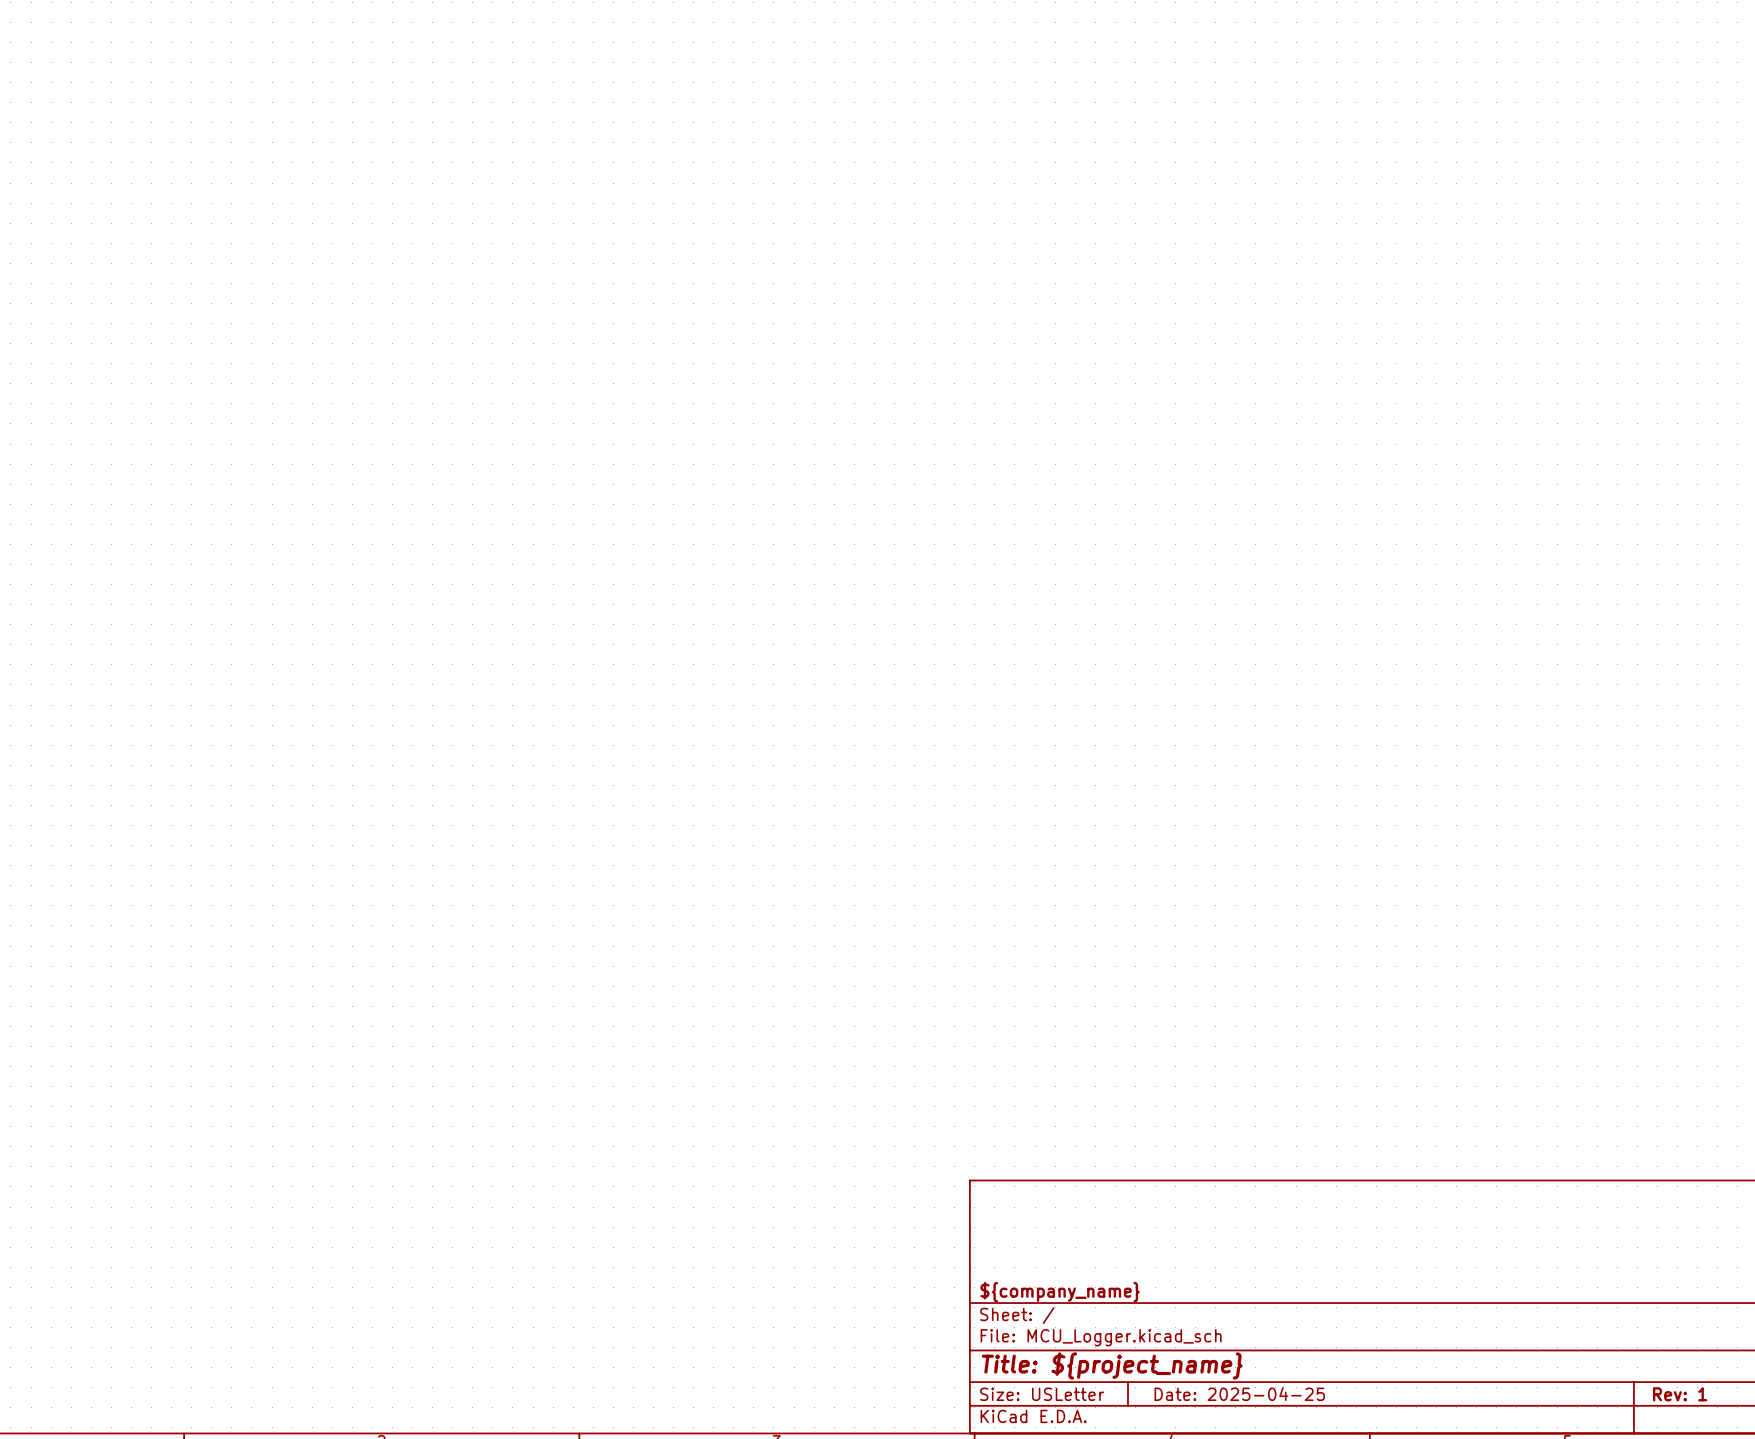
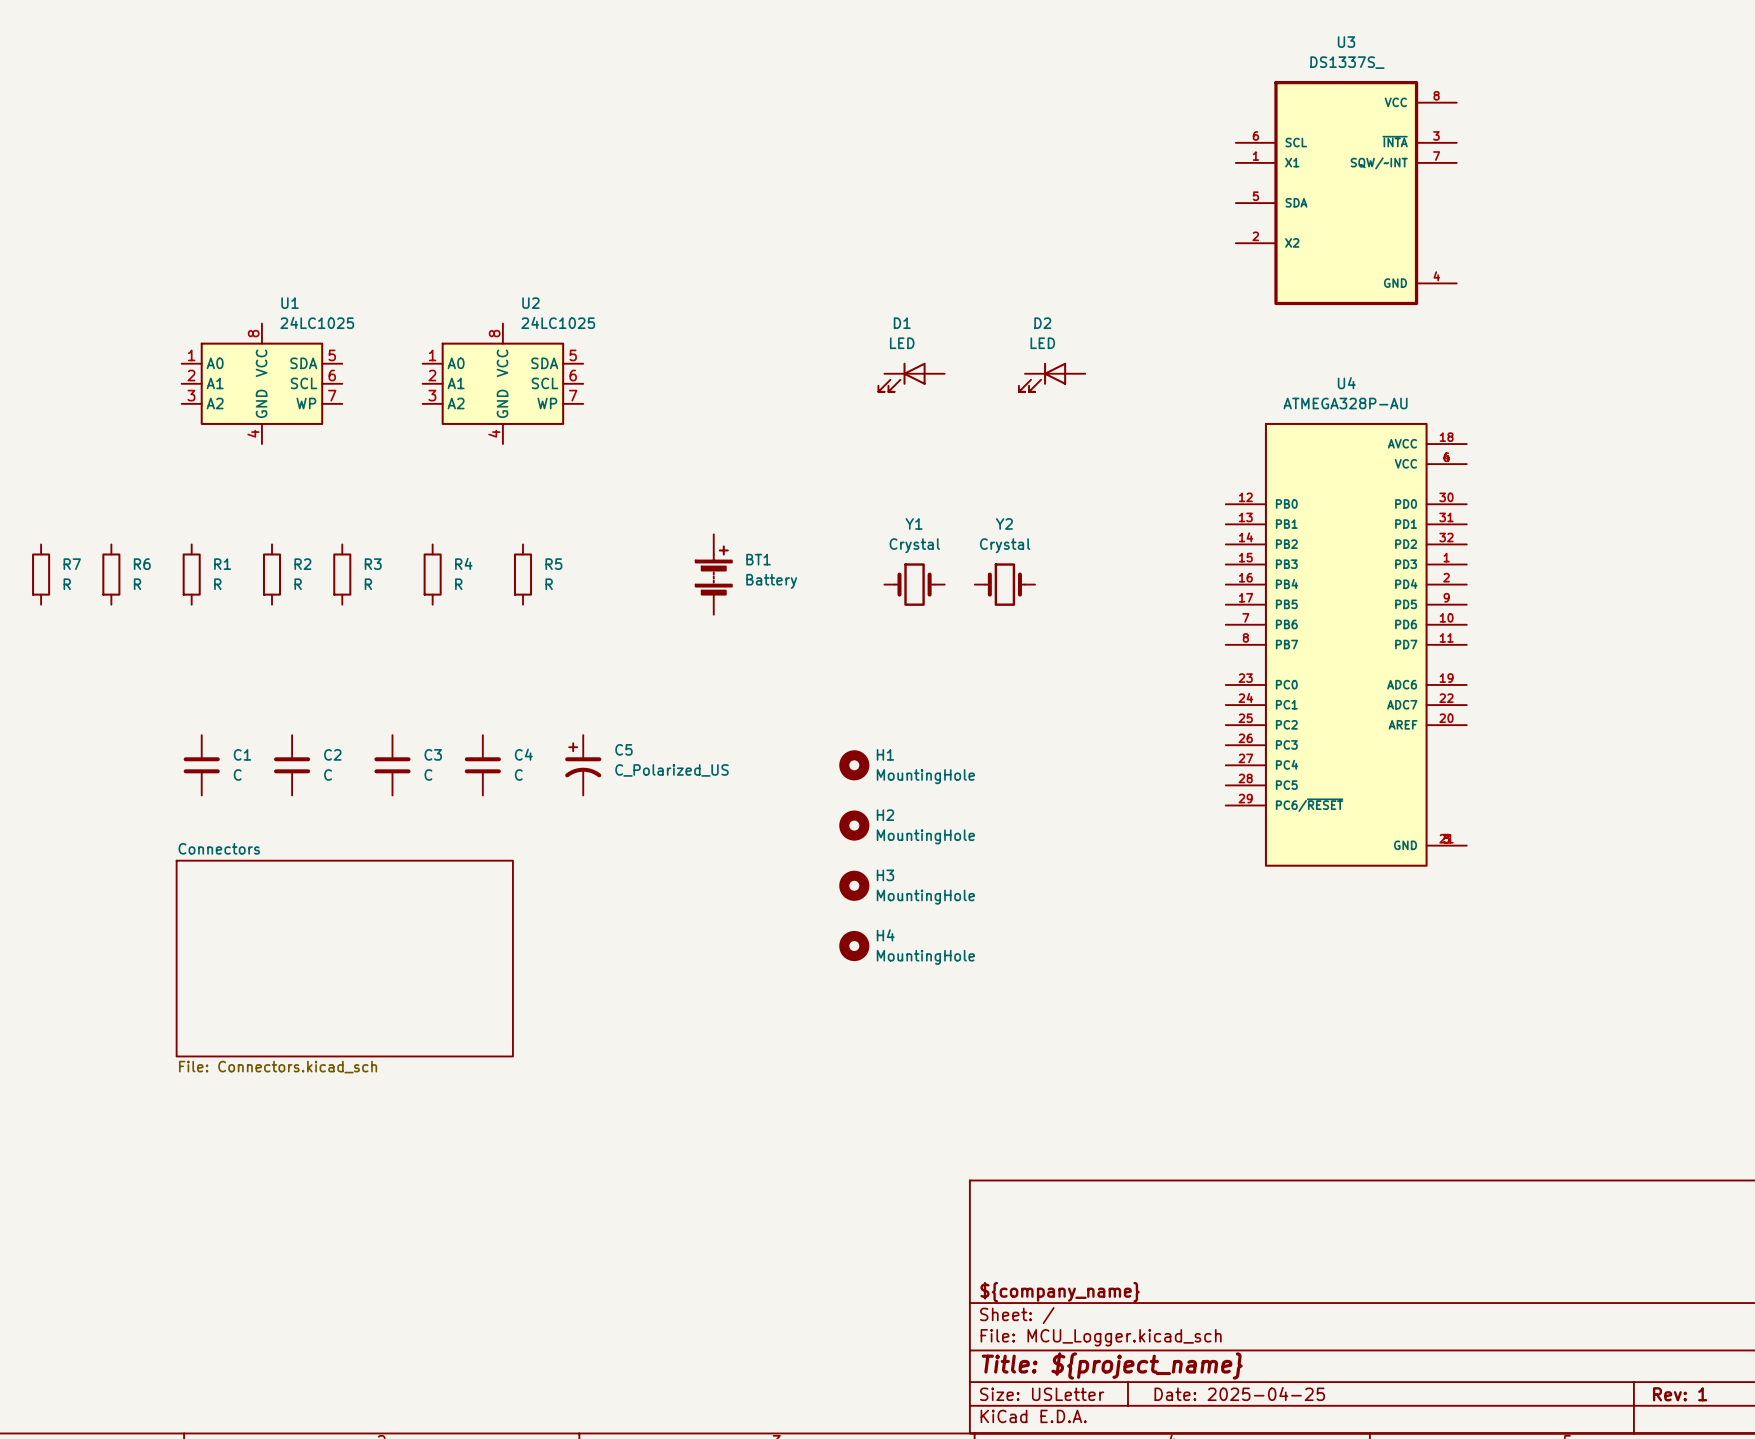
U3: none -> DS1337S_ (1346, 193)
D1: none -> LED (911, 377)
D2: none -> LED (1052, 377)
U1: none -> 24LC1025 (261, 383)
U2: none -> 24LC1025 (502, 383)
R7: none -> R (41, 574)
R6: none -> R (111, 574)
R1: none -> R (191, 574)
R2: none -> R (272, 574)
R3: none -> R (342, 574)
R4: none -> R (432, 574)
R5: none -> R (523, 574)
BT1: none -> Battery (713, 574)
Y1: none -> Crystal (914, 584)
Y2: none -> Crystal (1004, 584)
U4: none -> ATMEGA328P-AU (1346, 644)
C1: none -> C (201, 765)
C2: none -> C (292, 765)
C3: none -> C (392, 765)
C4: none -> C (482, 765)
C5: none -> C_Polarized_US (583, 765)
H1: none -> MountingHole (854, 765)
H2: none -> MountingHole (854, 825)
H3: none -> MountingHole (854, 885)
H4: none -> MountingHole (854, 946)
sheet Connectors: none -> File: Connectors.kicad_sch (344, 958)

